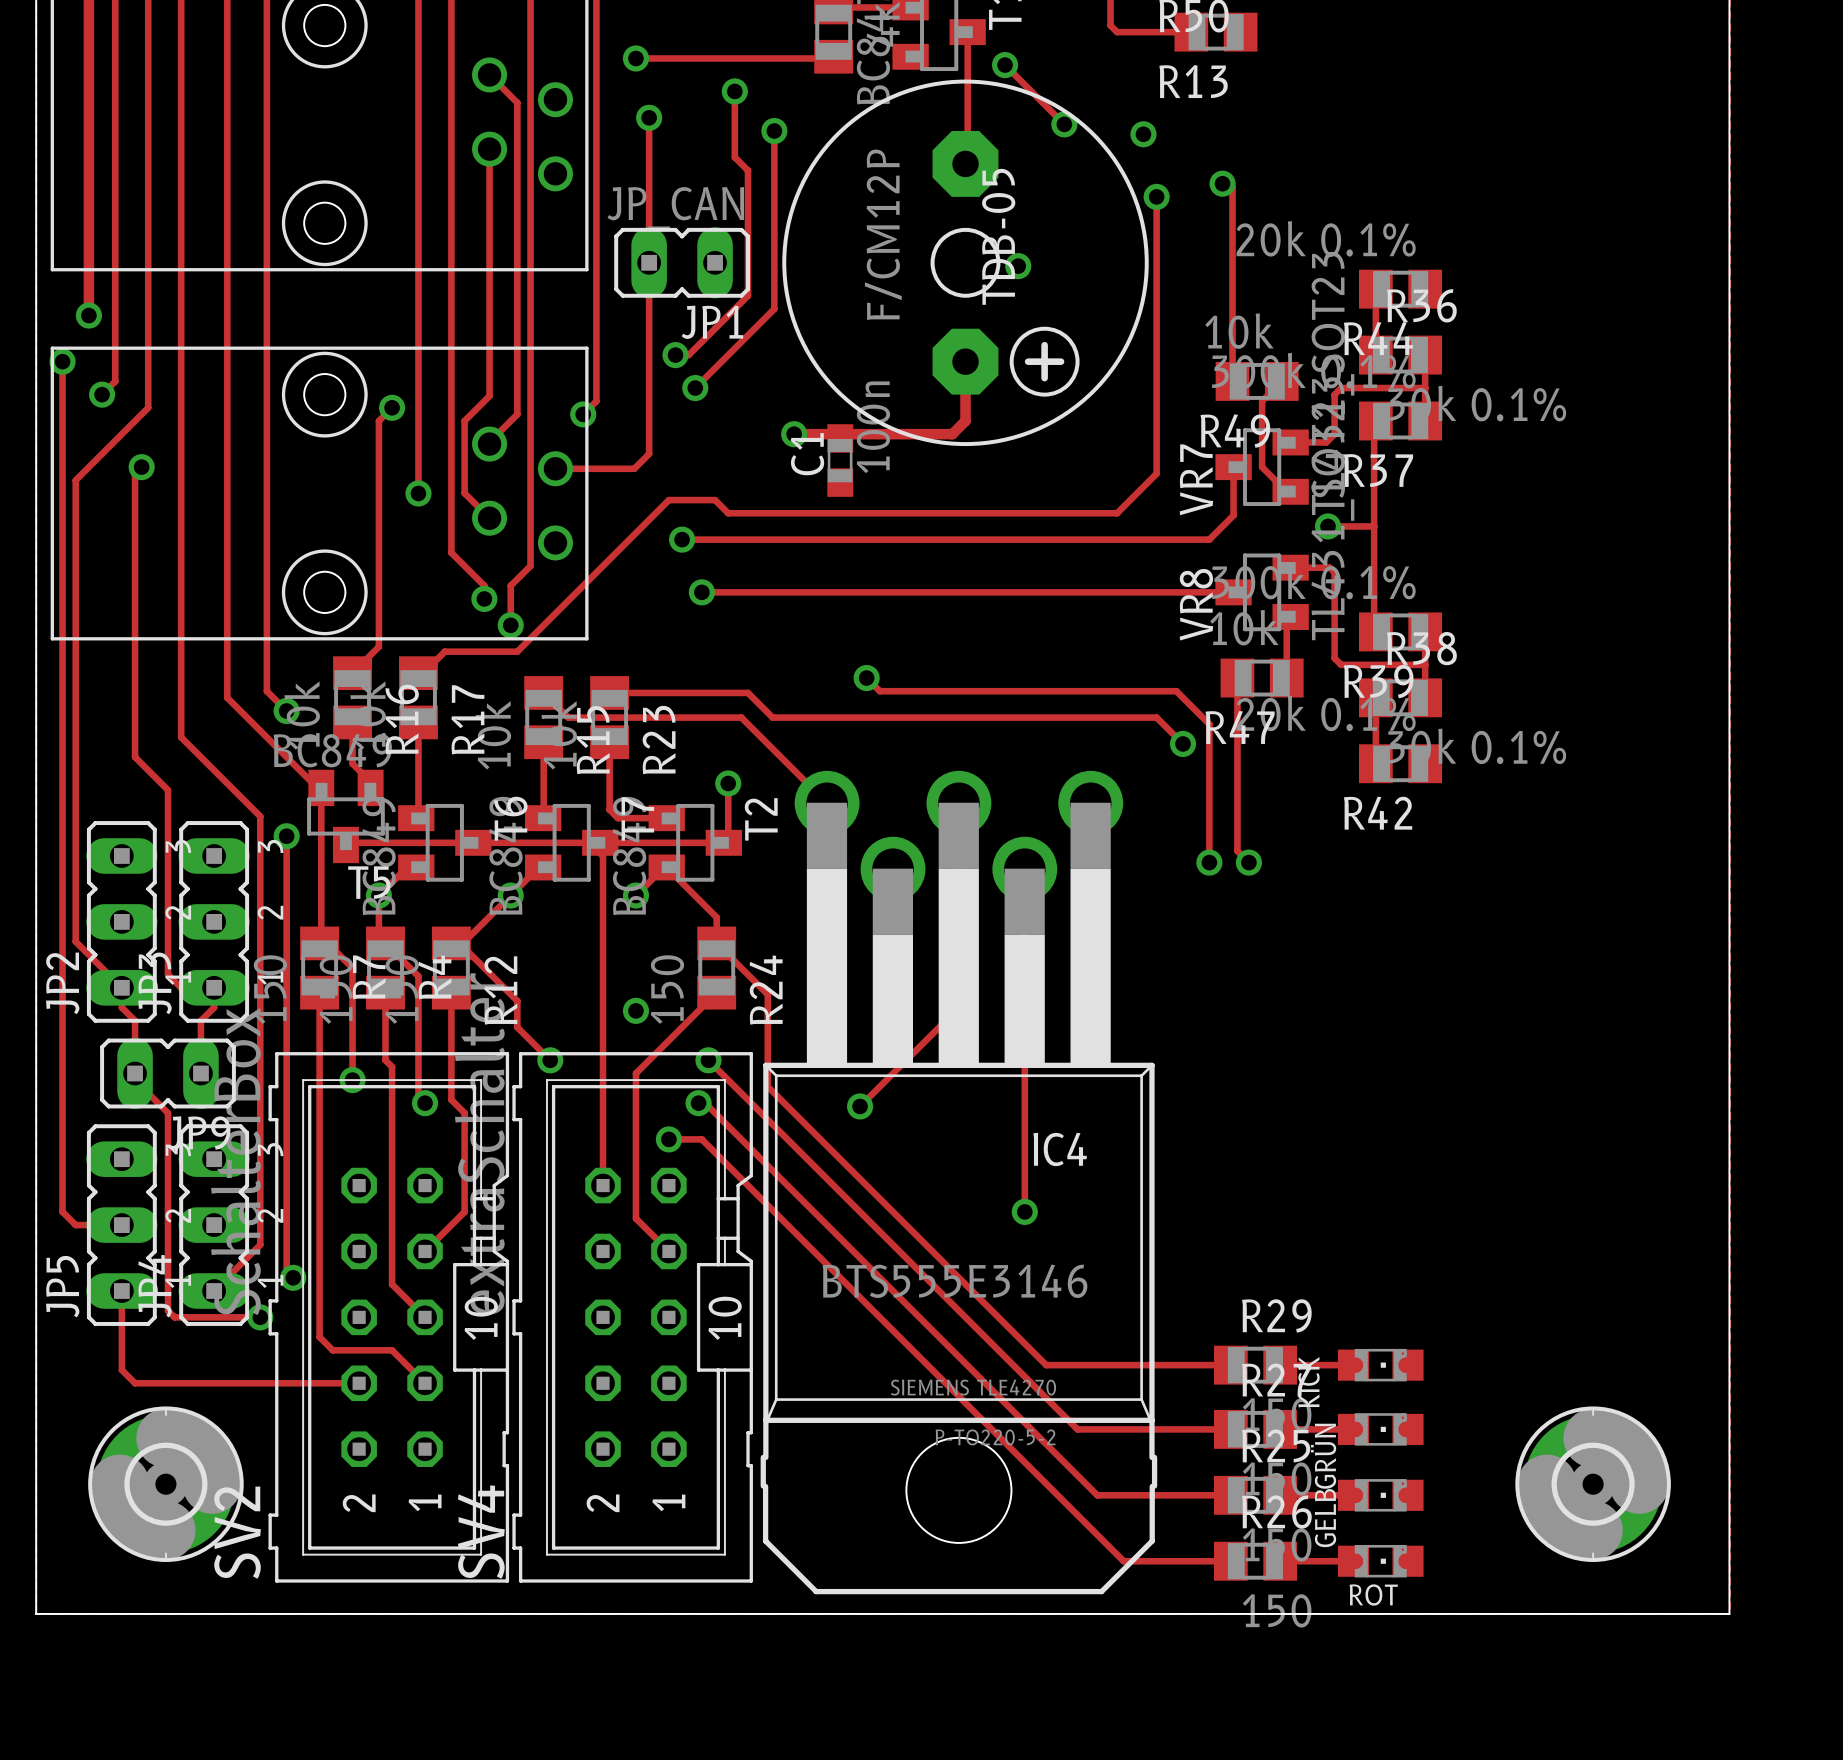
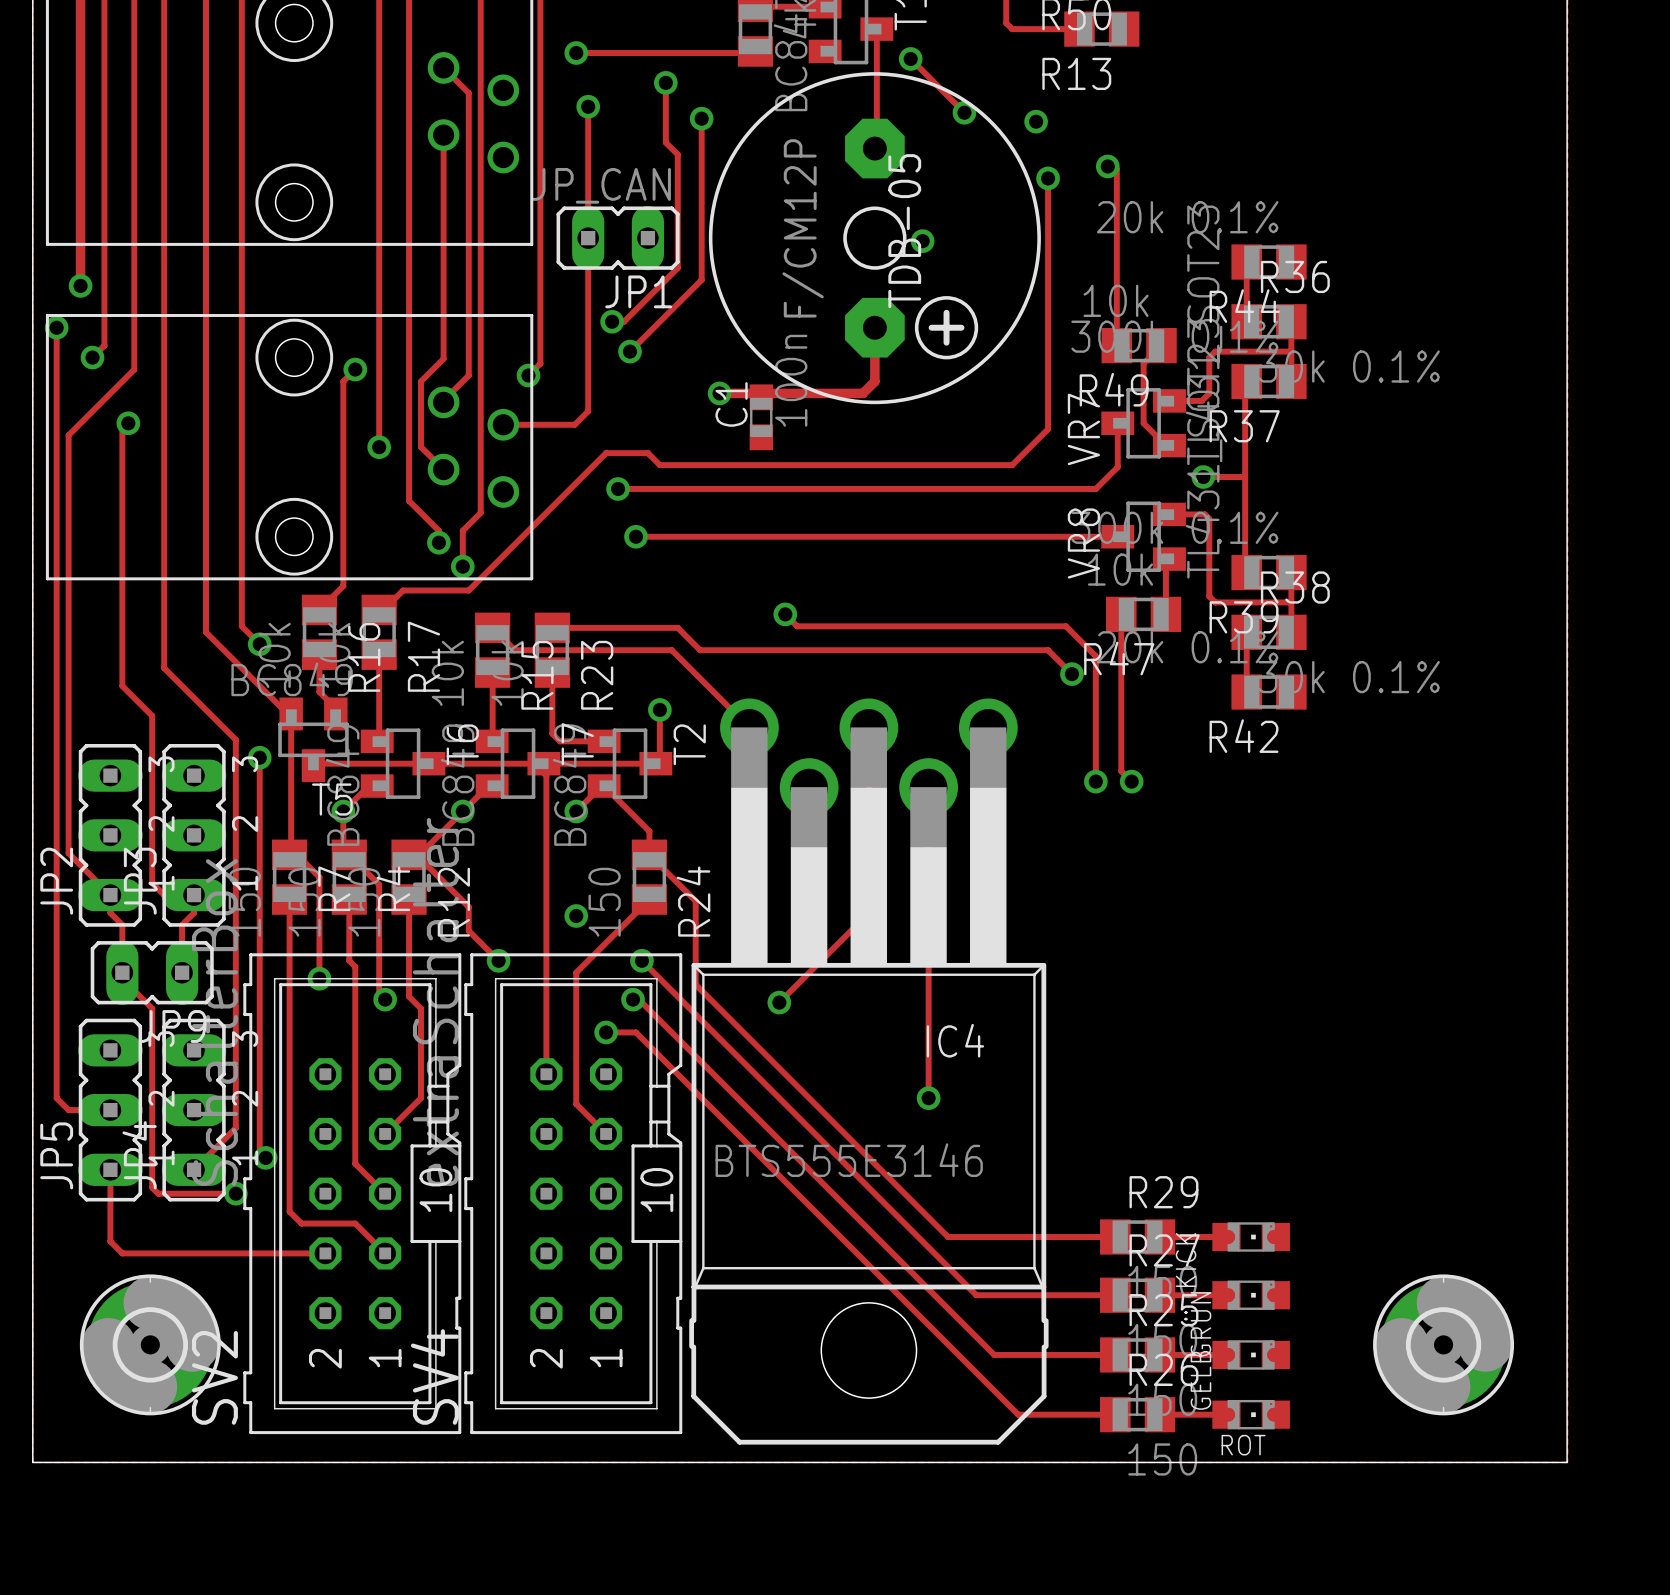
IC4 text: SIEMENS TLE4270 (973, 1387) -> none
IC4 text: P-TO220-5-2 (995, 1437) -> none

